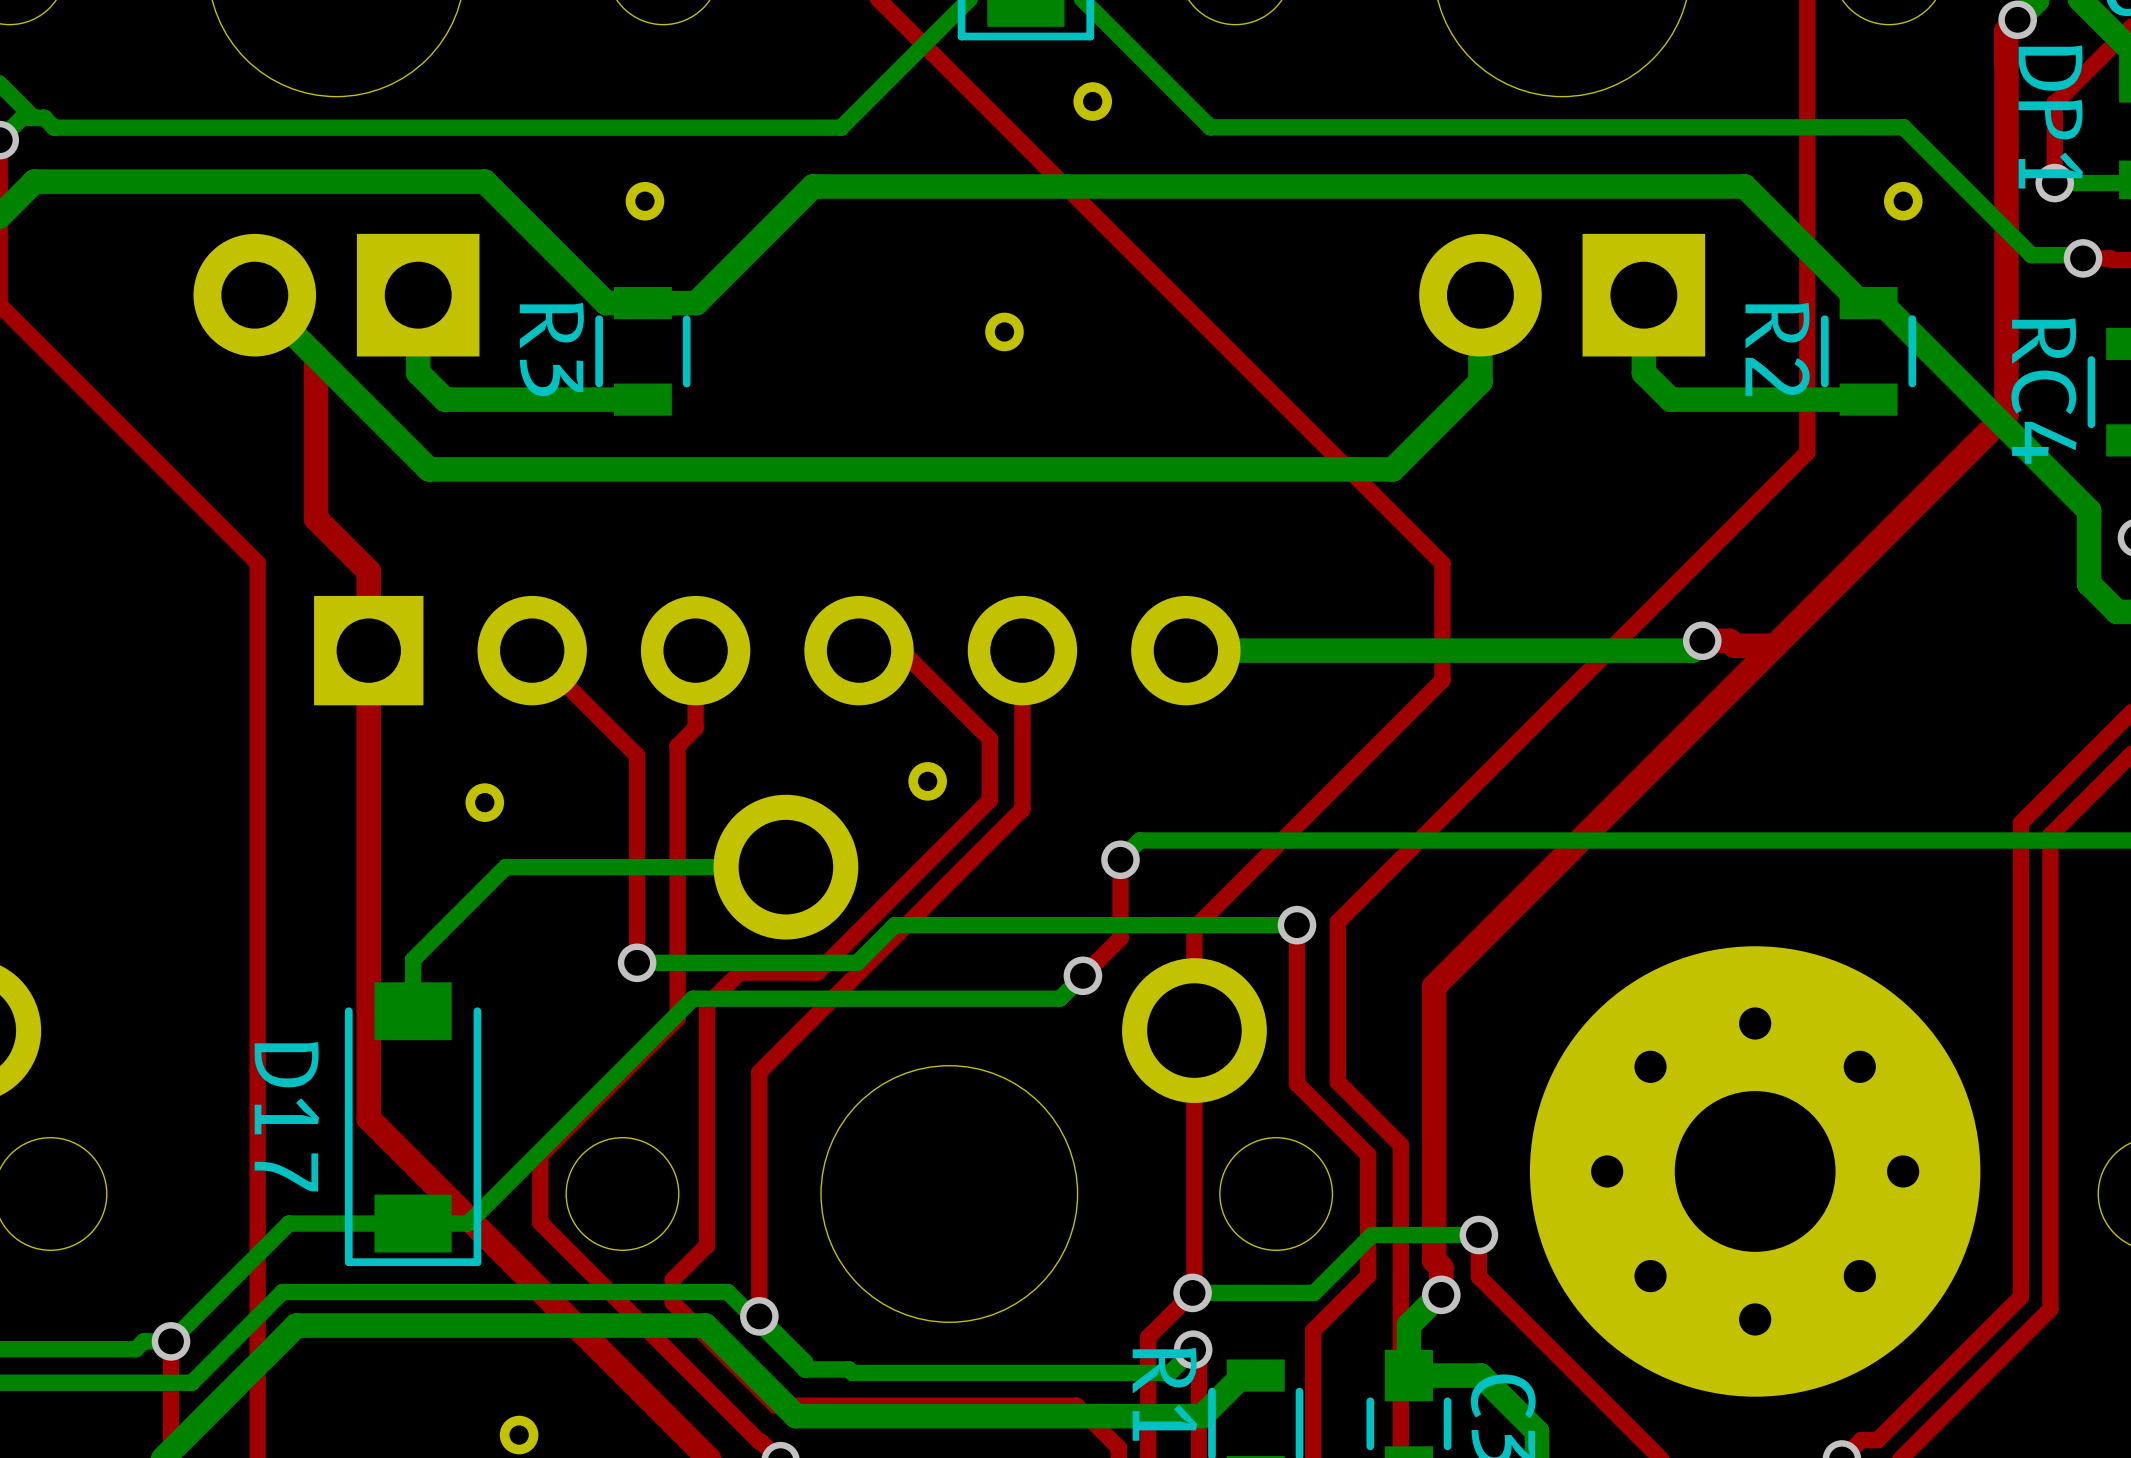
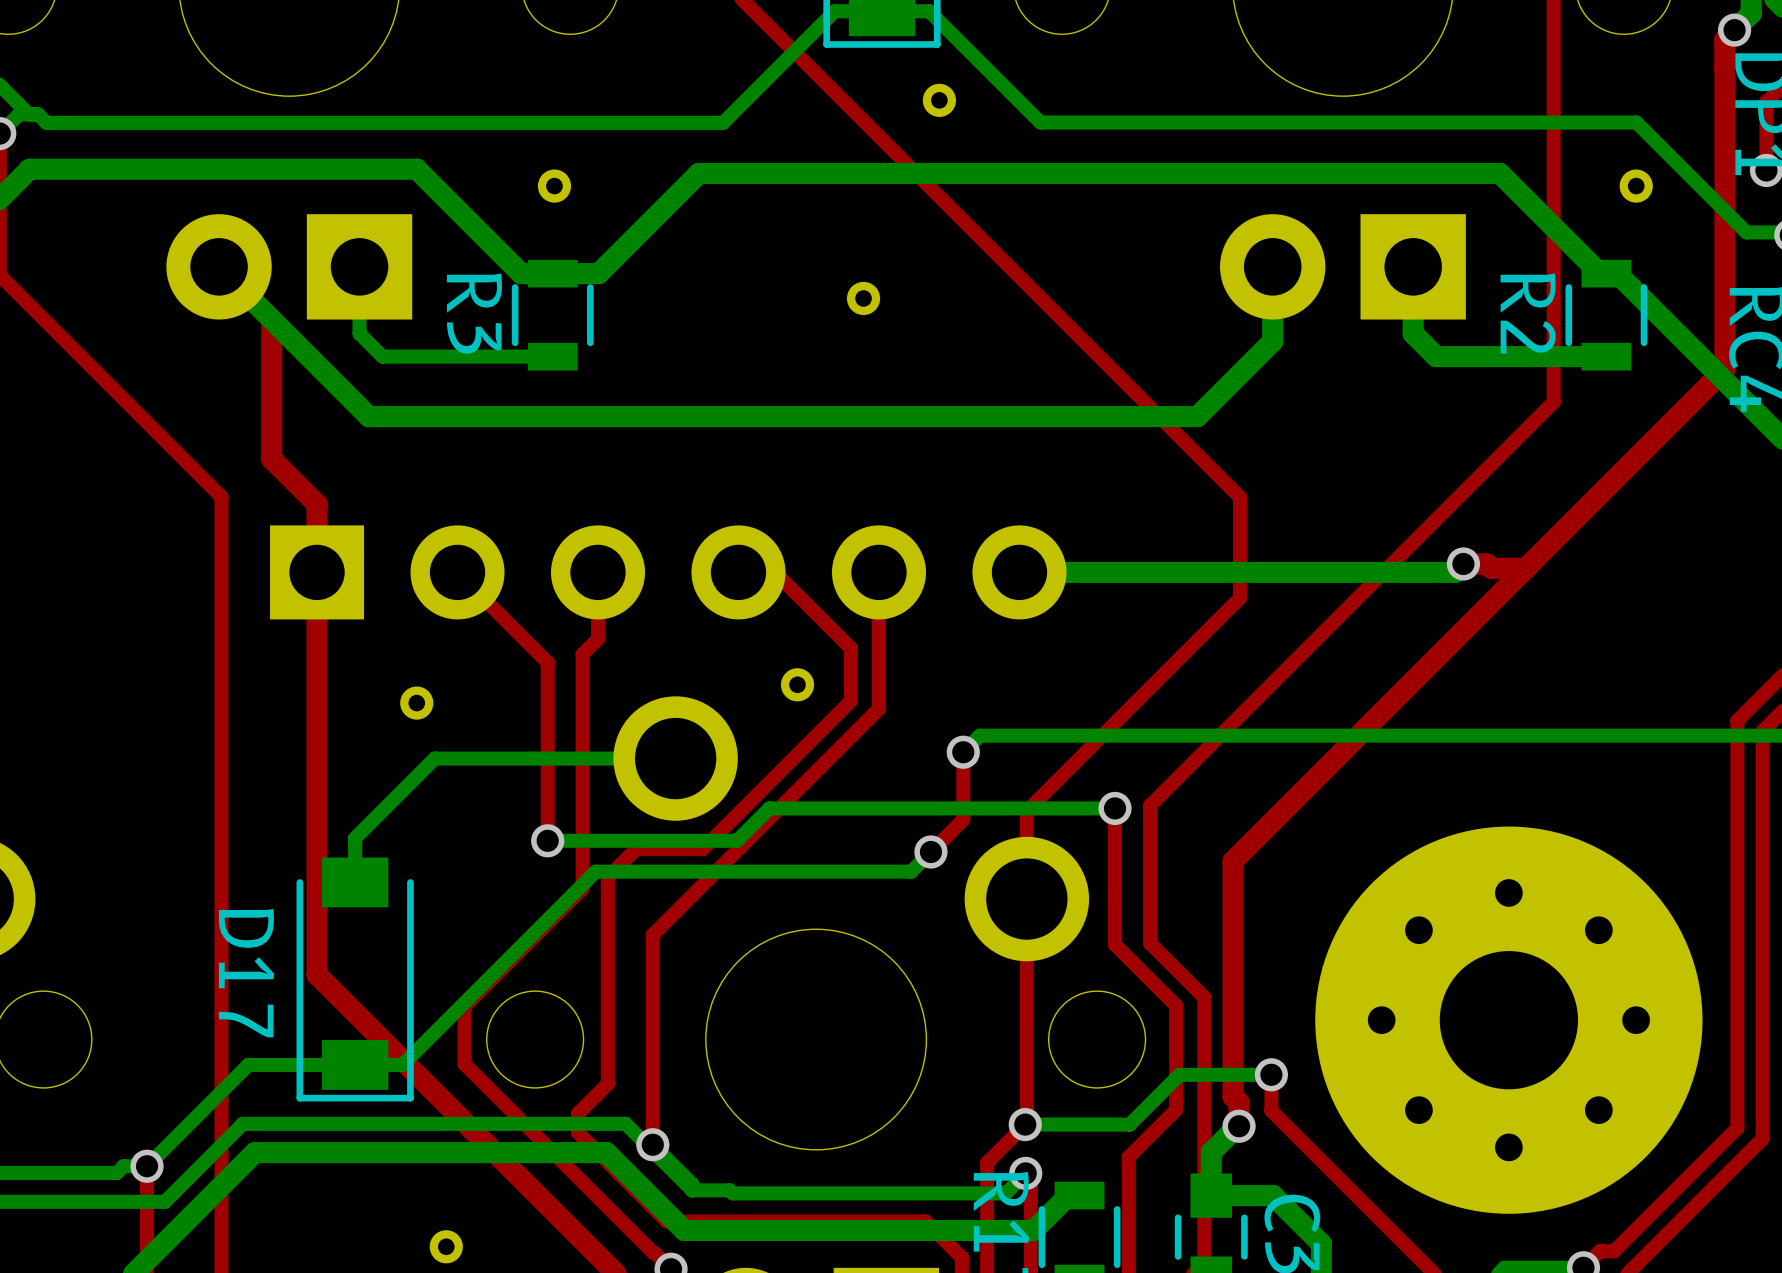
bottom track width: thick (418, 295) (418, 372) (445, 399) (642, 399) -> thin (359, 266) (359, 333) (382, 356) (552, 356)

